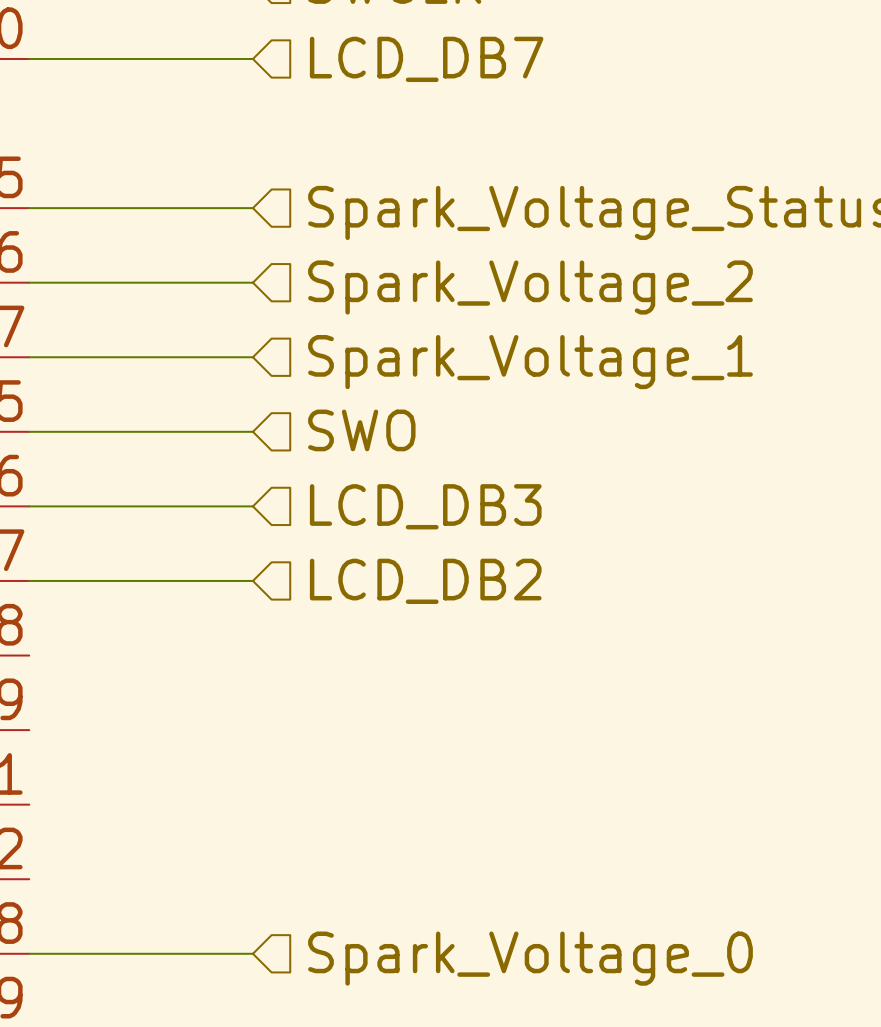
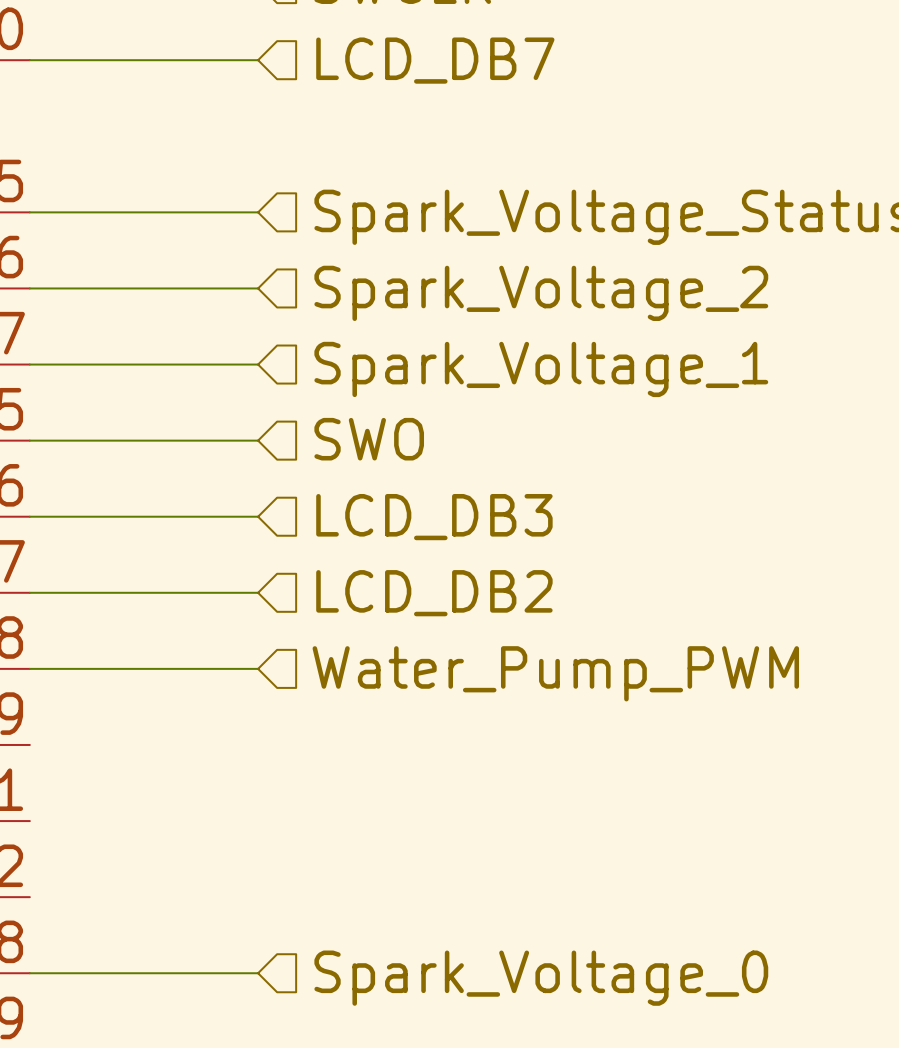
wire: none -> (29, 668) (258, 668)
hierarchical label: none -> Water_Pump_PWM (555, 673)

